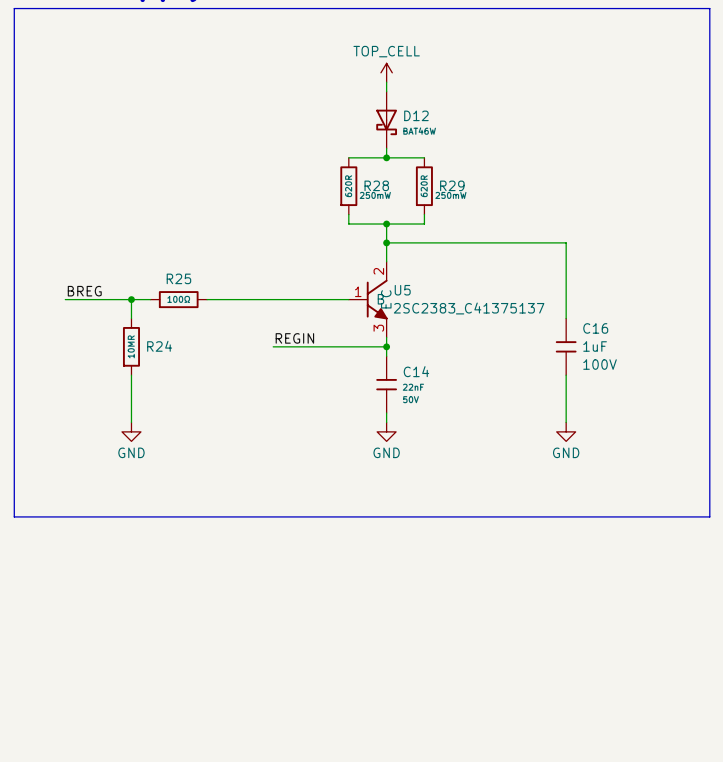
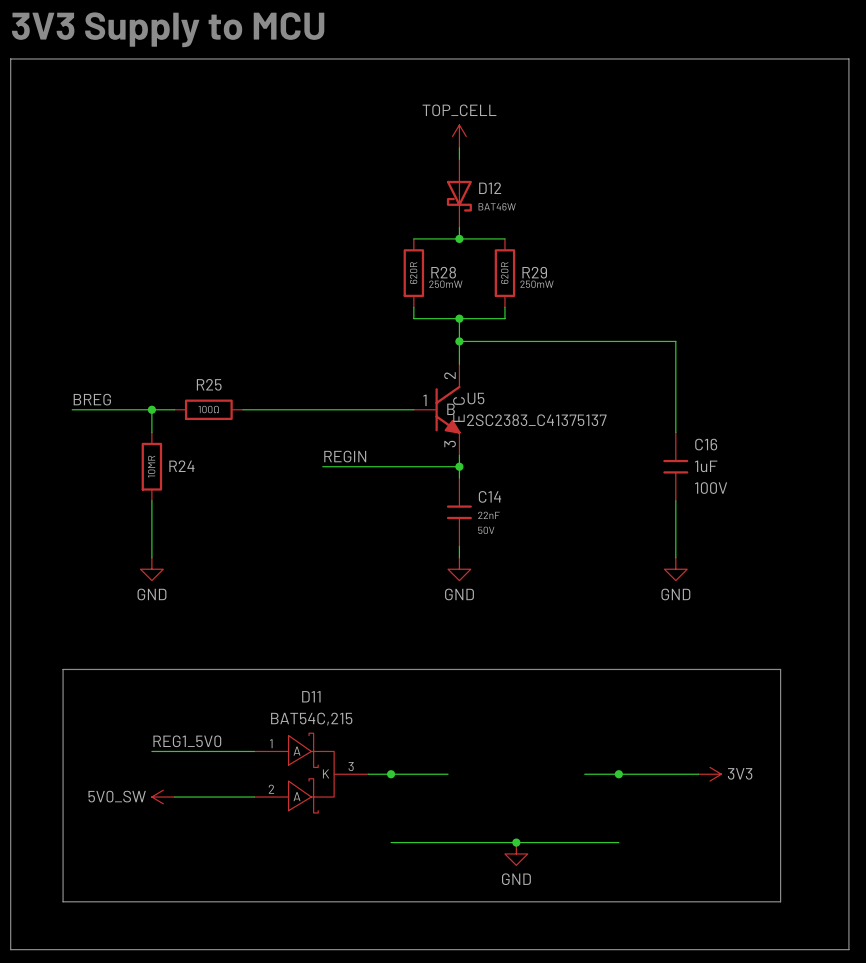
line: none -> (63, 669) (780, 669) (780, 901) (63, 901) (63, 669)
line: (14, 516) (709, 516) -> (10, 671) (10, 949) (848, 949) (848, 671)
label: none -> REG1_5V0 (187, 741)
wire: none -> (151, 751) (254, 751)
D11: none -> BAT54C,215 (311, 773)
wire: none -> (368, 774) (448, 774)
junction: none -> (391, 774)
wire: none -> (584, 774) (698, 774)
junction: none -> (618, 774)
power symbol: none -> 3V3 (709, 774)
power symbol: none -> 5V0_SW (163, 797)
wire: none -> (174, 797) (254, 797)
wire: none -> (391, 842) (618, 842)
junction: none -> (516, 842)
power symbol: none -> GND (516, 853)

